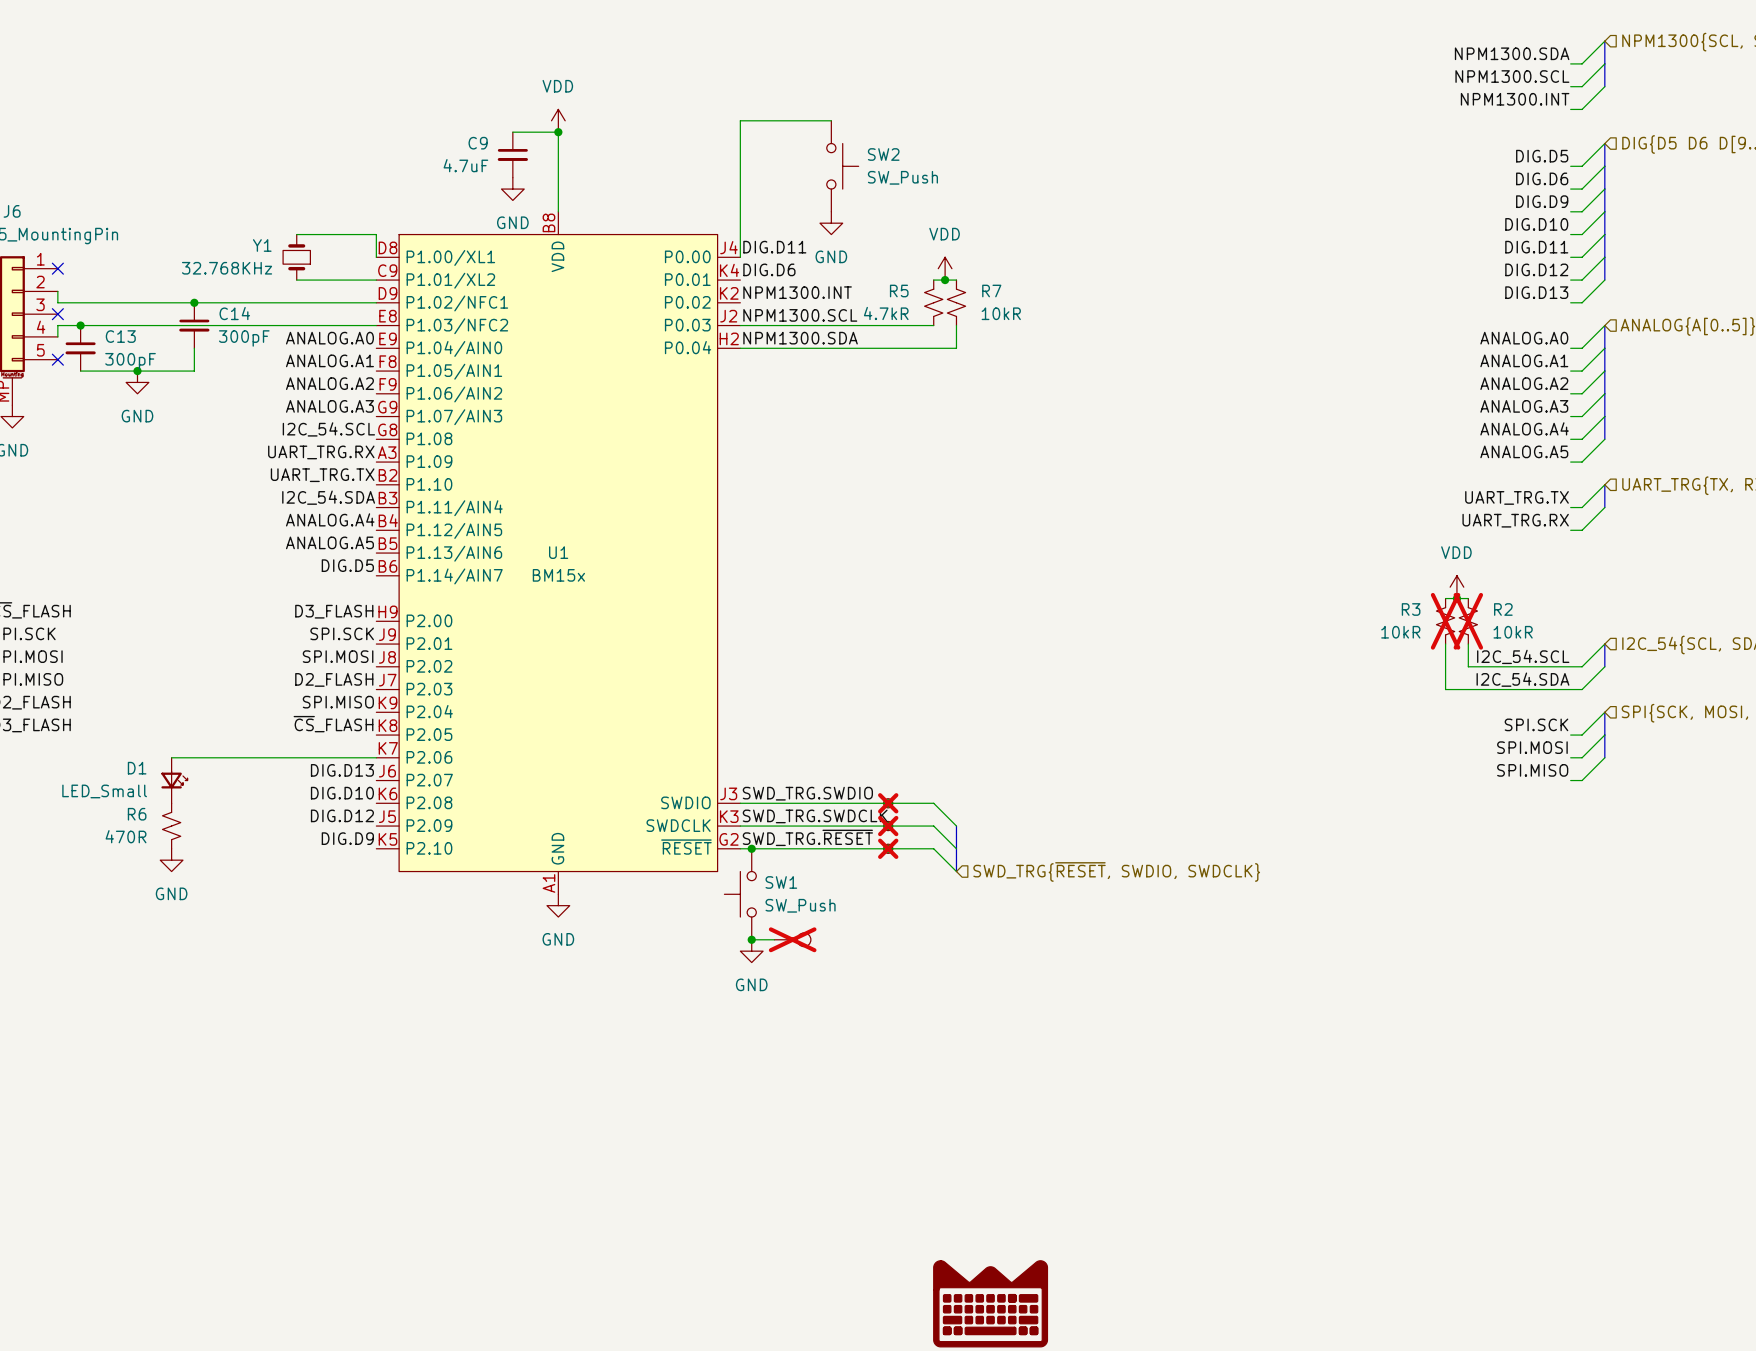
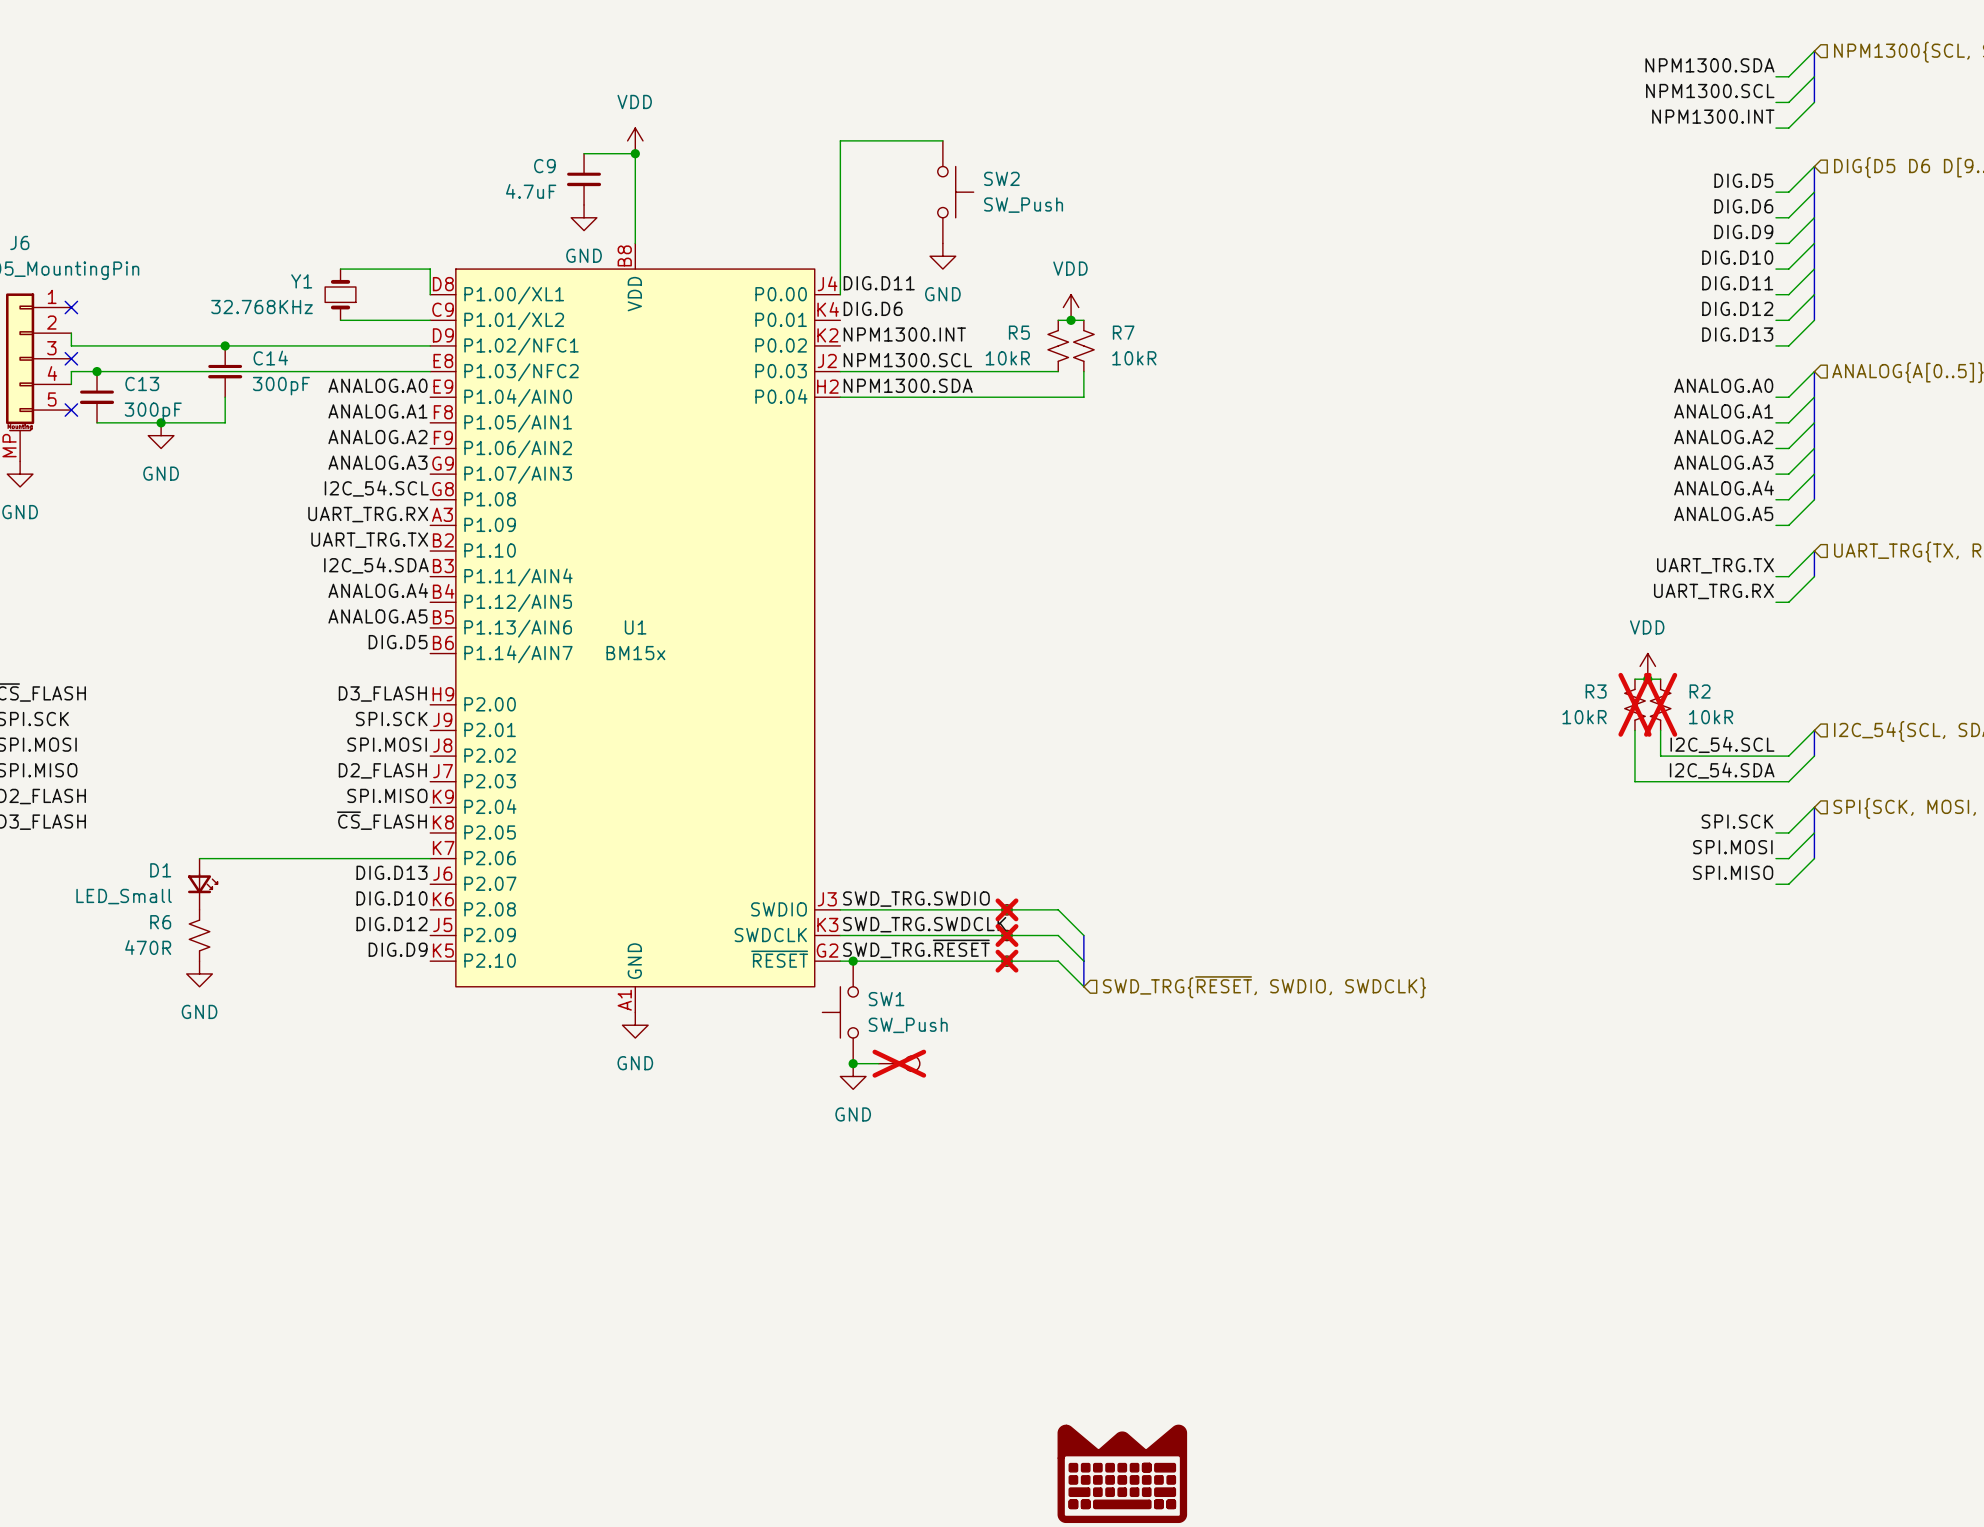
R5 value: 4.7kR (886, 313) -> 10kR (1007, 358)

